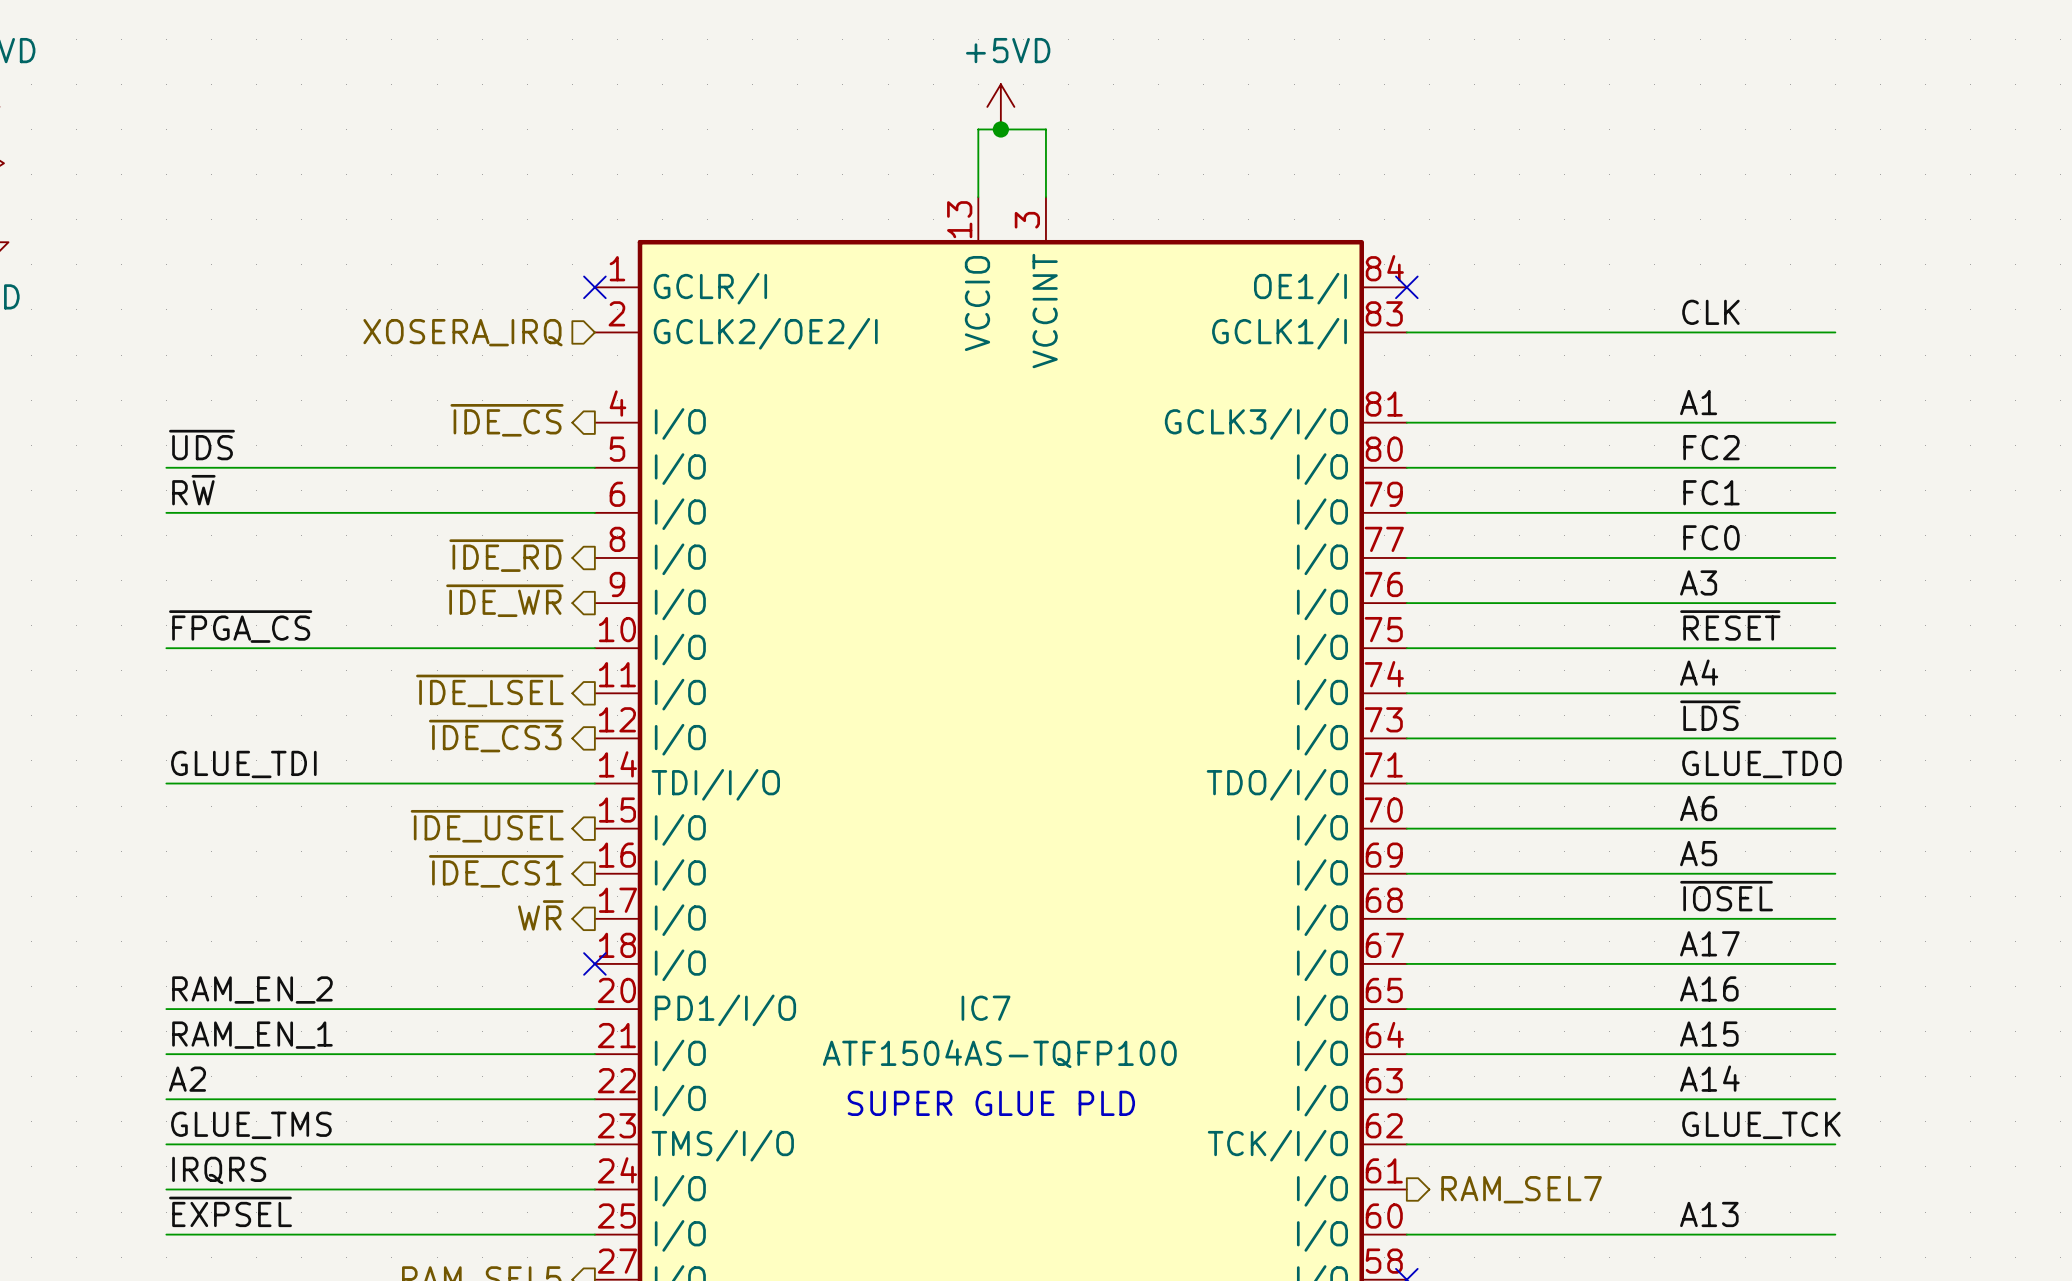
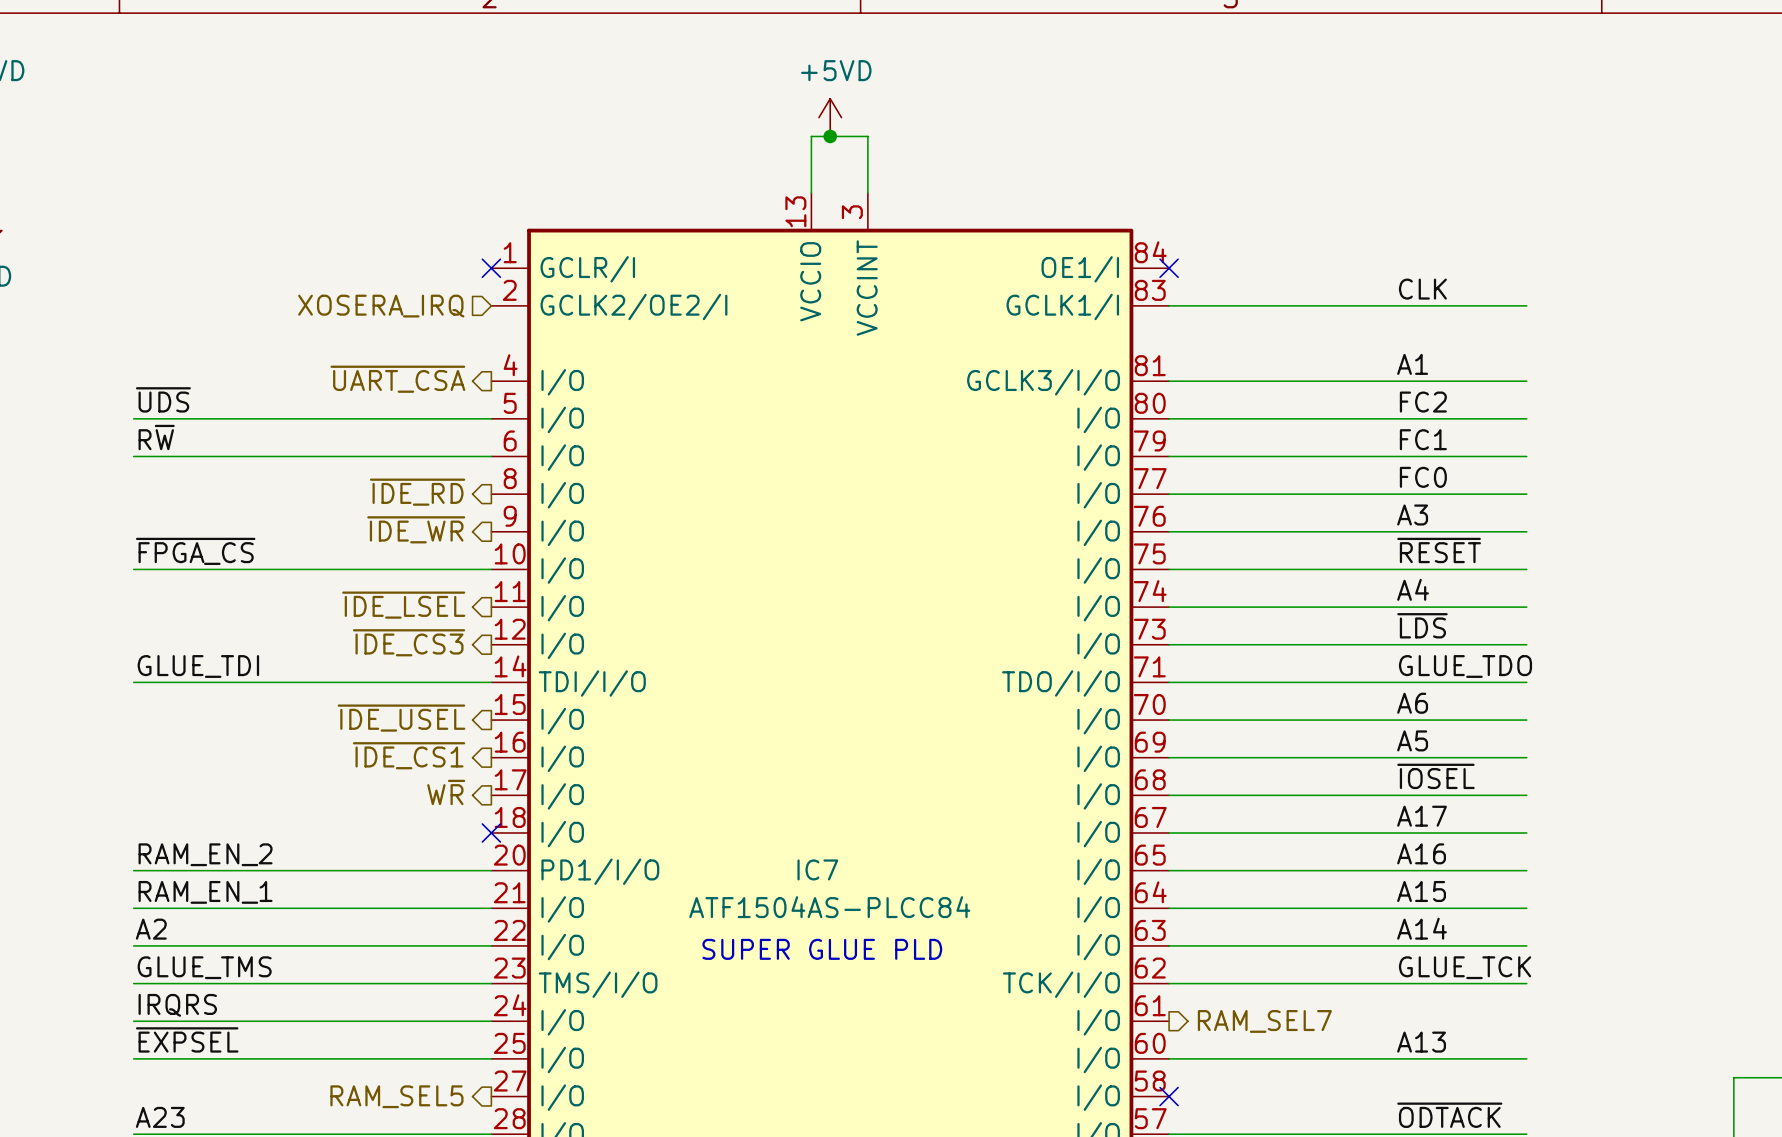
hierarchical label: ~{IDE_CS} (507, 420) -> ~{UART_CSA} (397, 379)
IC7 value: ATF1504AS-TQFP100 (999, 1053) -> ATF1504AS-PLCC84 (829, 907)

